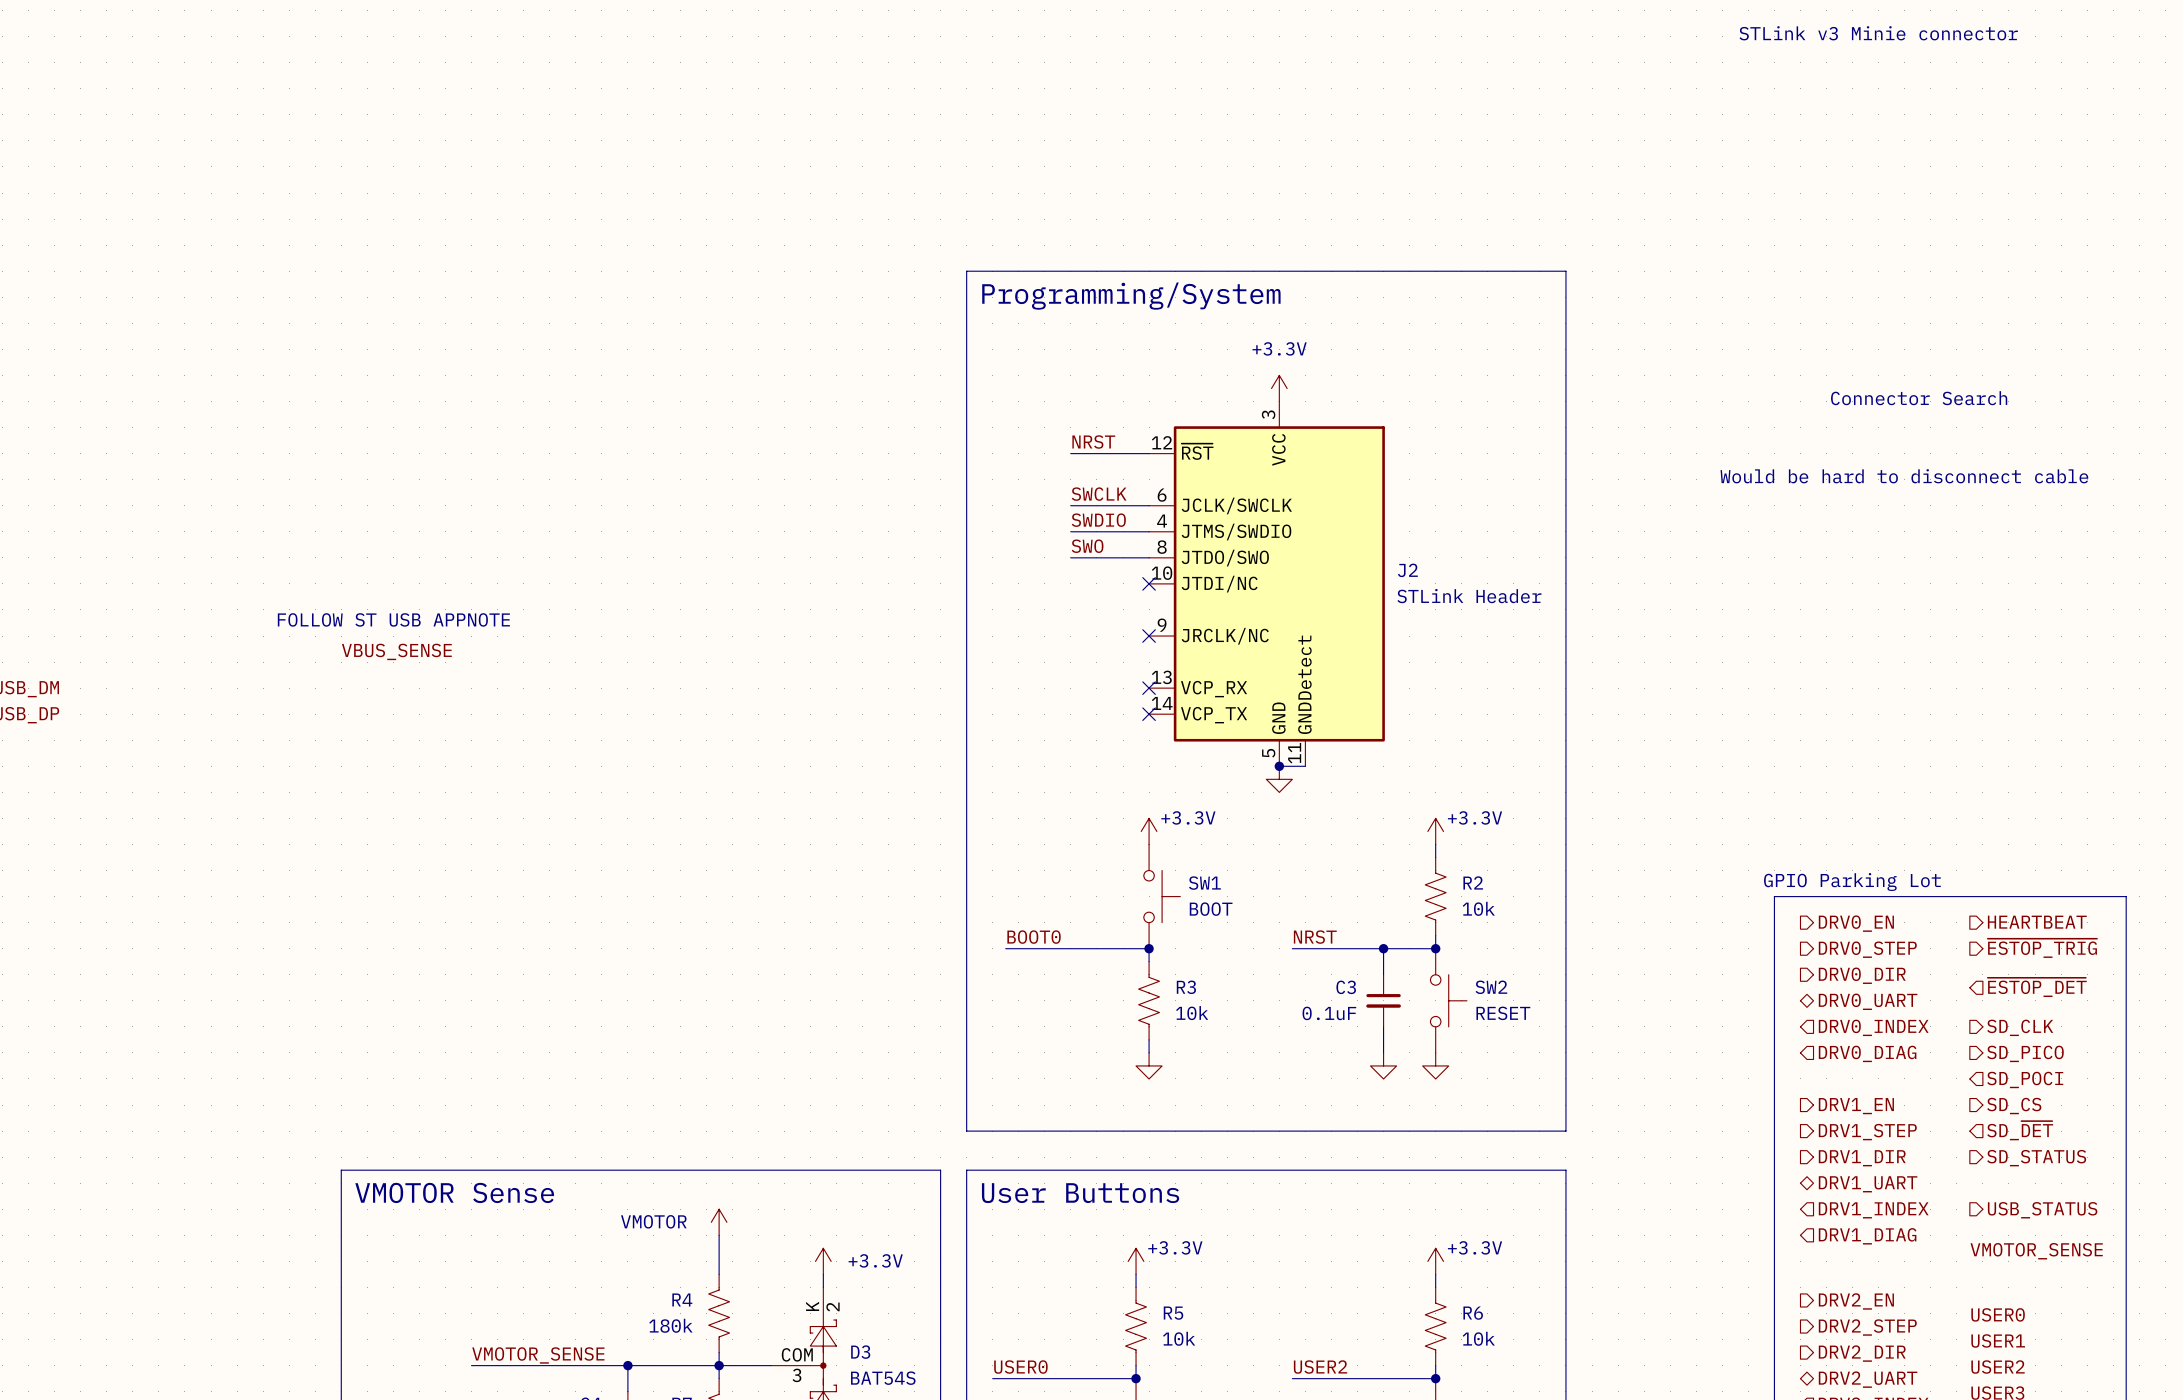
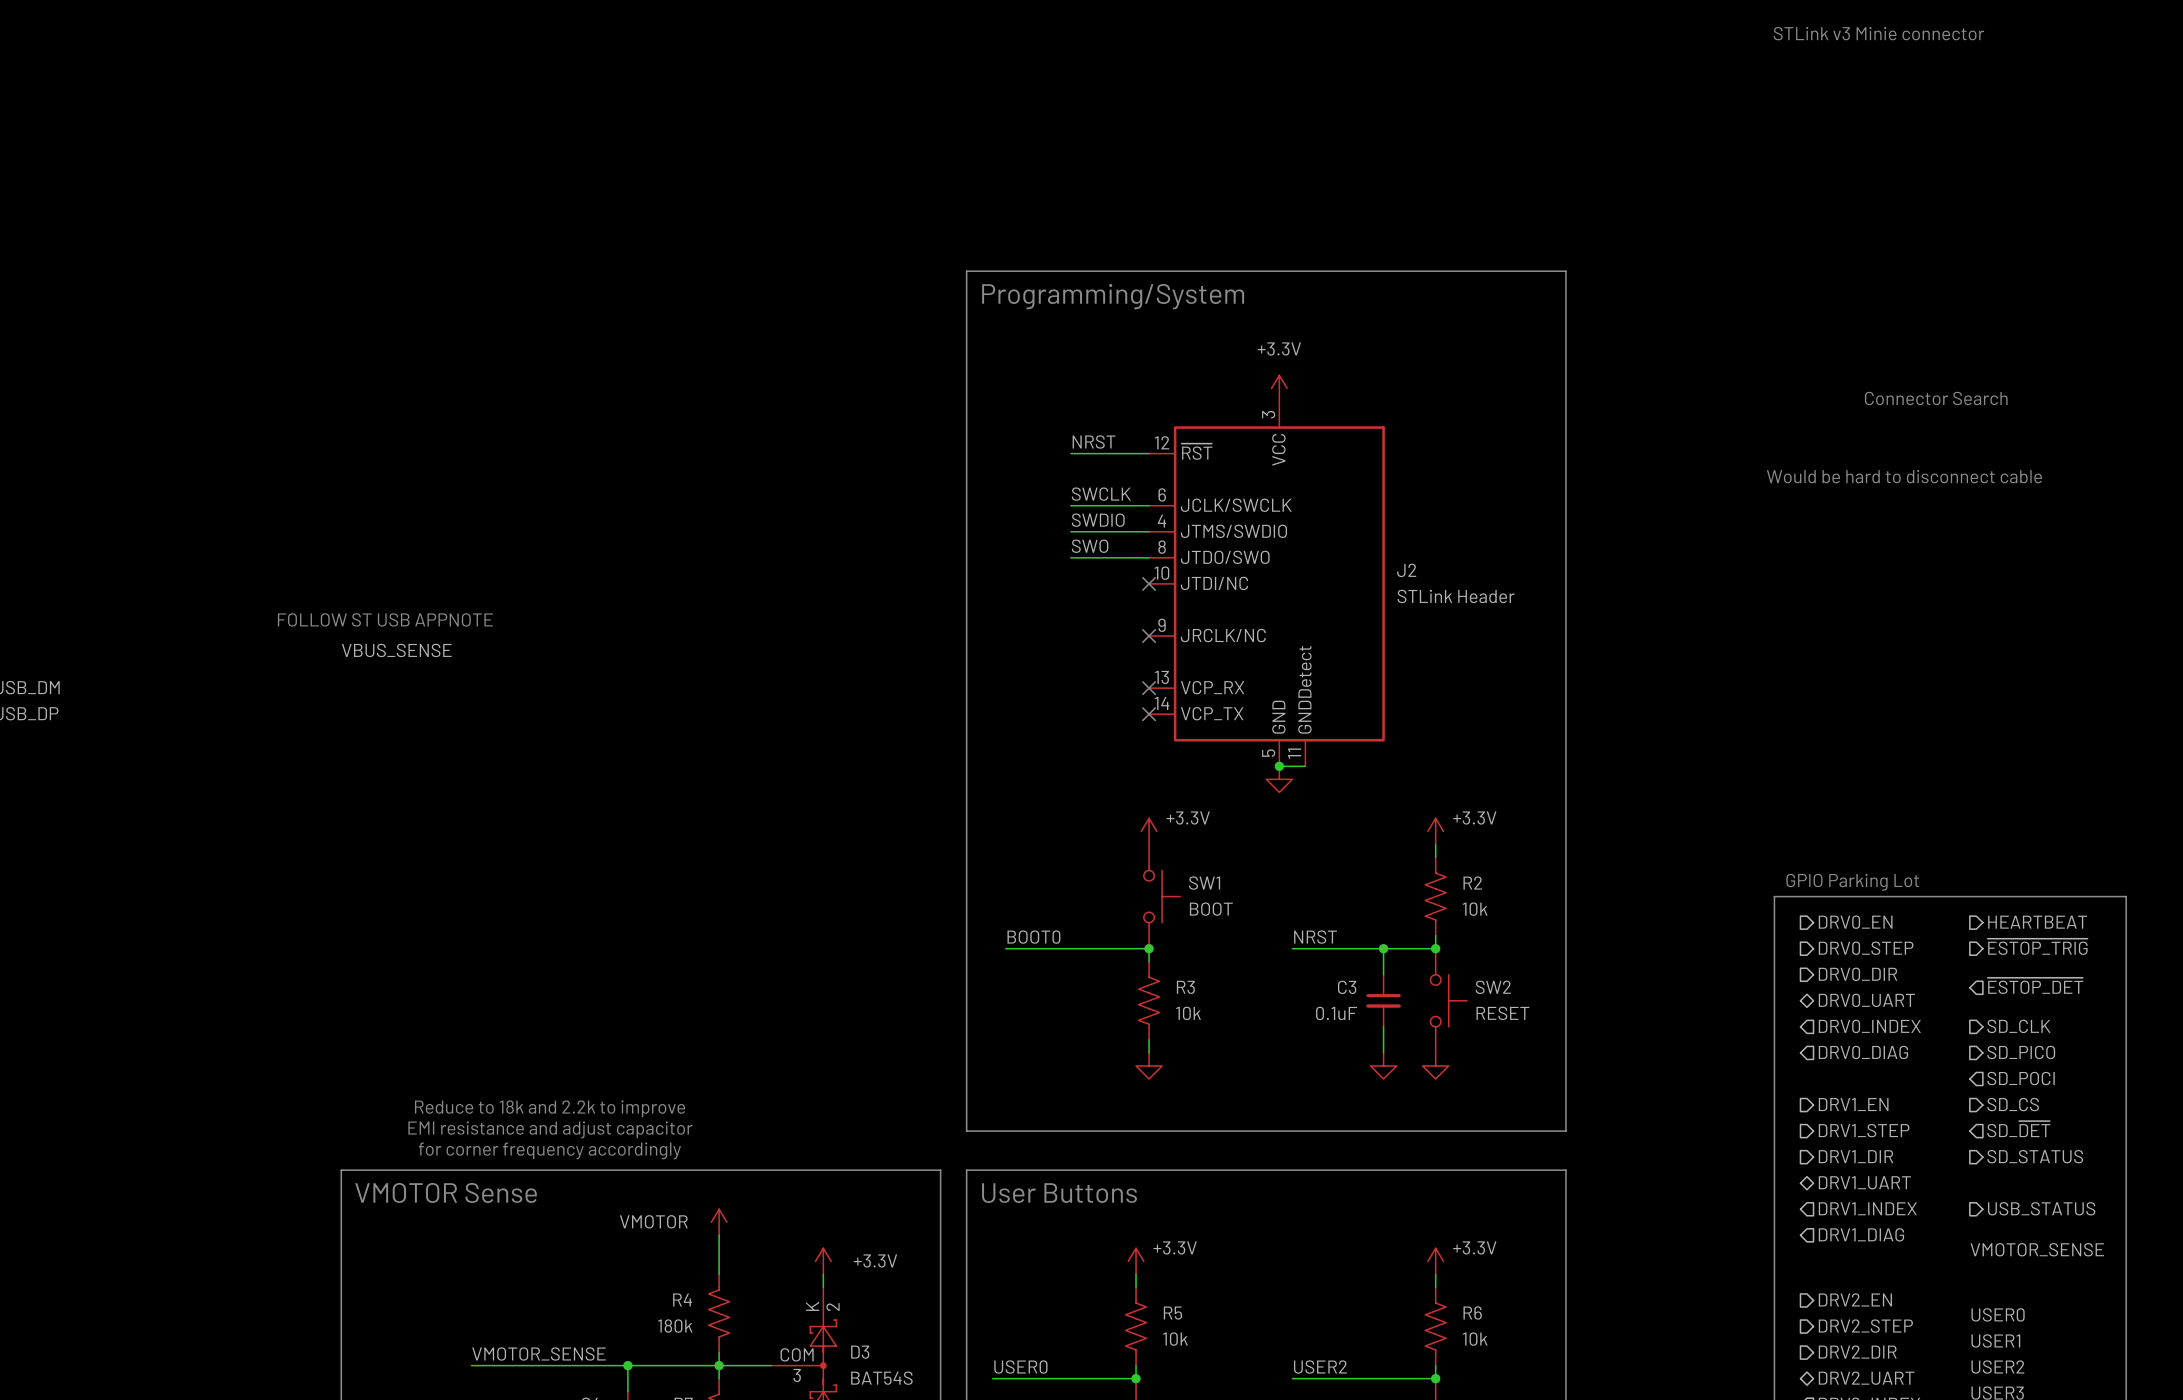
text: none -> Reduce to 18k and 2.2k to improve (550, 1108)
text: none -> EMI resistance and adjust capacitor (550, 1129)
text: none -> for corner frequency accordingly (549, 1150)

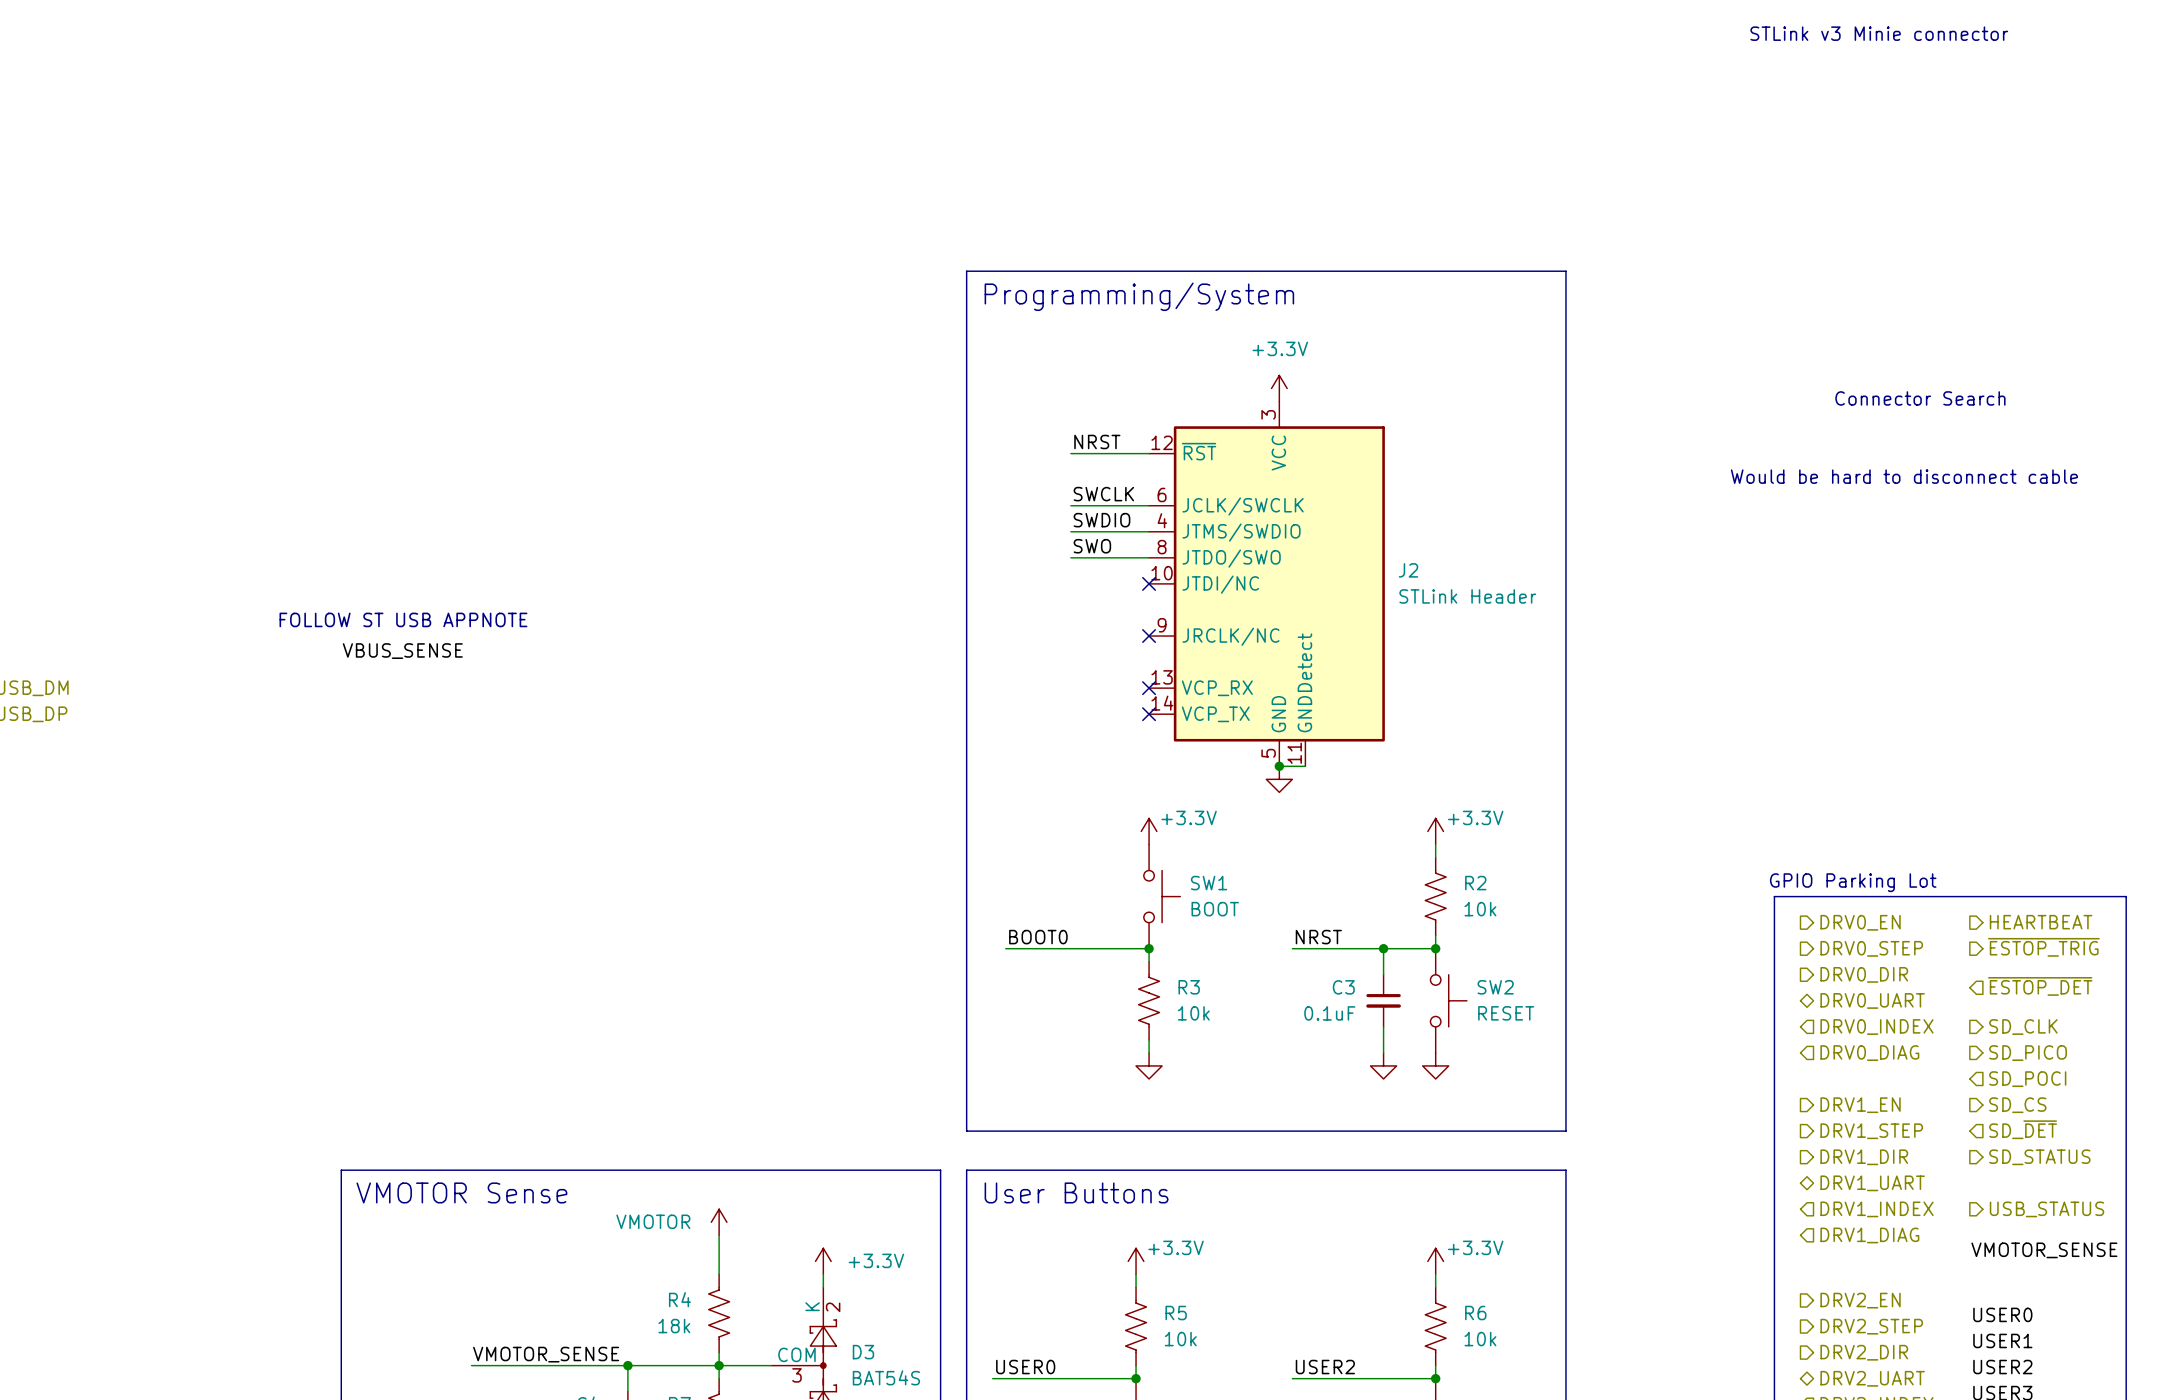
text: Reduce to 18k and 2.2k to improve (550, 1108) -> none
text: EMI resistance and adjust capacitor (550, 1129) -> none
text: for corner frequency accordingly (549, 1150) -> none
R4 value: 180k (675, 1326) -> 18k (674, 1326)

